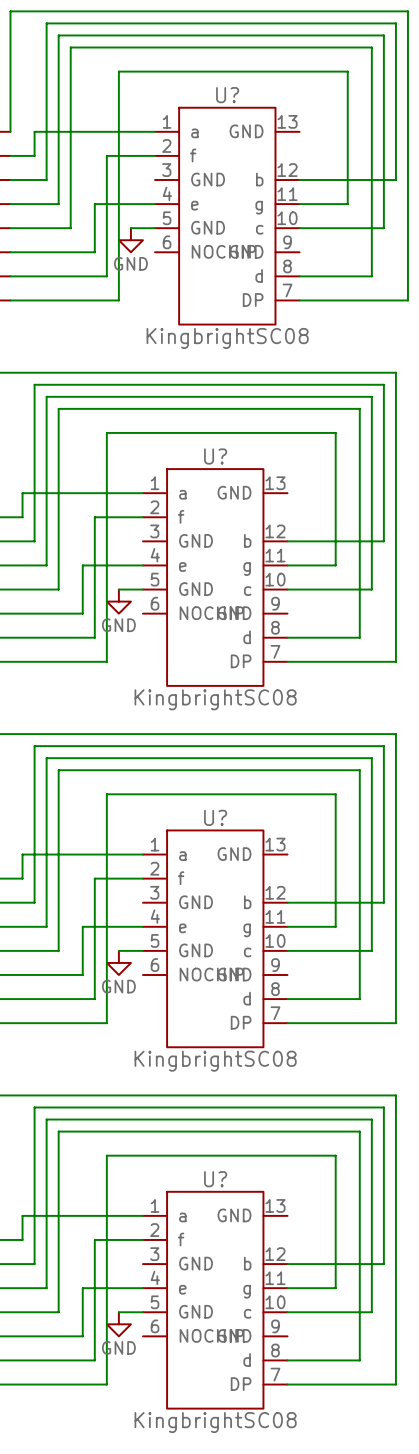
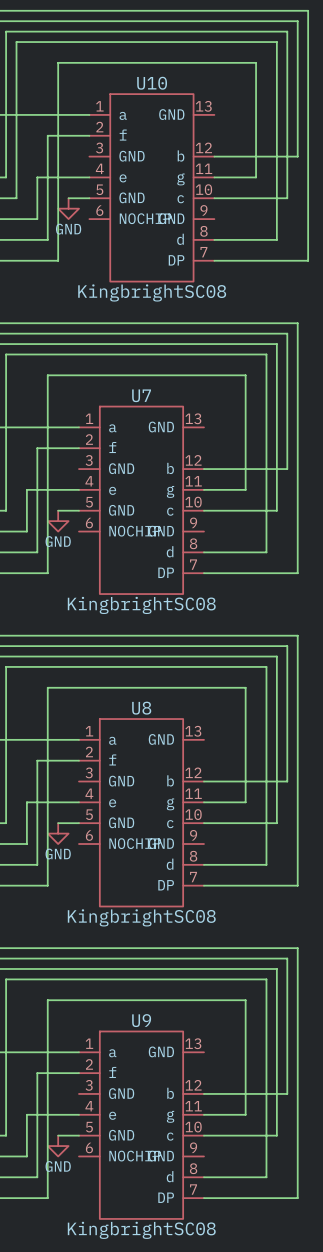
U? name: U? (227, 95) -> U10 (152, 83)
U? name: U? (215, 456) -> U7 (141, 395)
U? name: U? (215, 817) -> U8 (141, 708)
U? name: U? (215, 1179) -> U9 (141, 1020)

